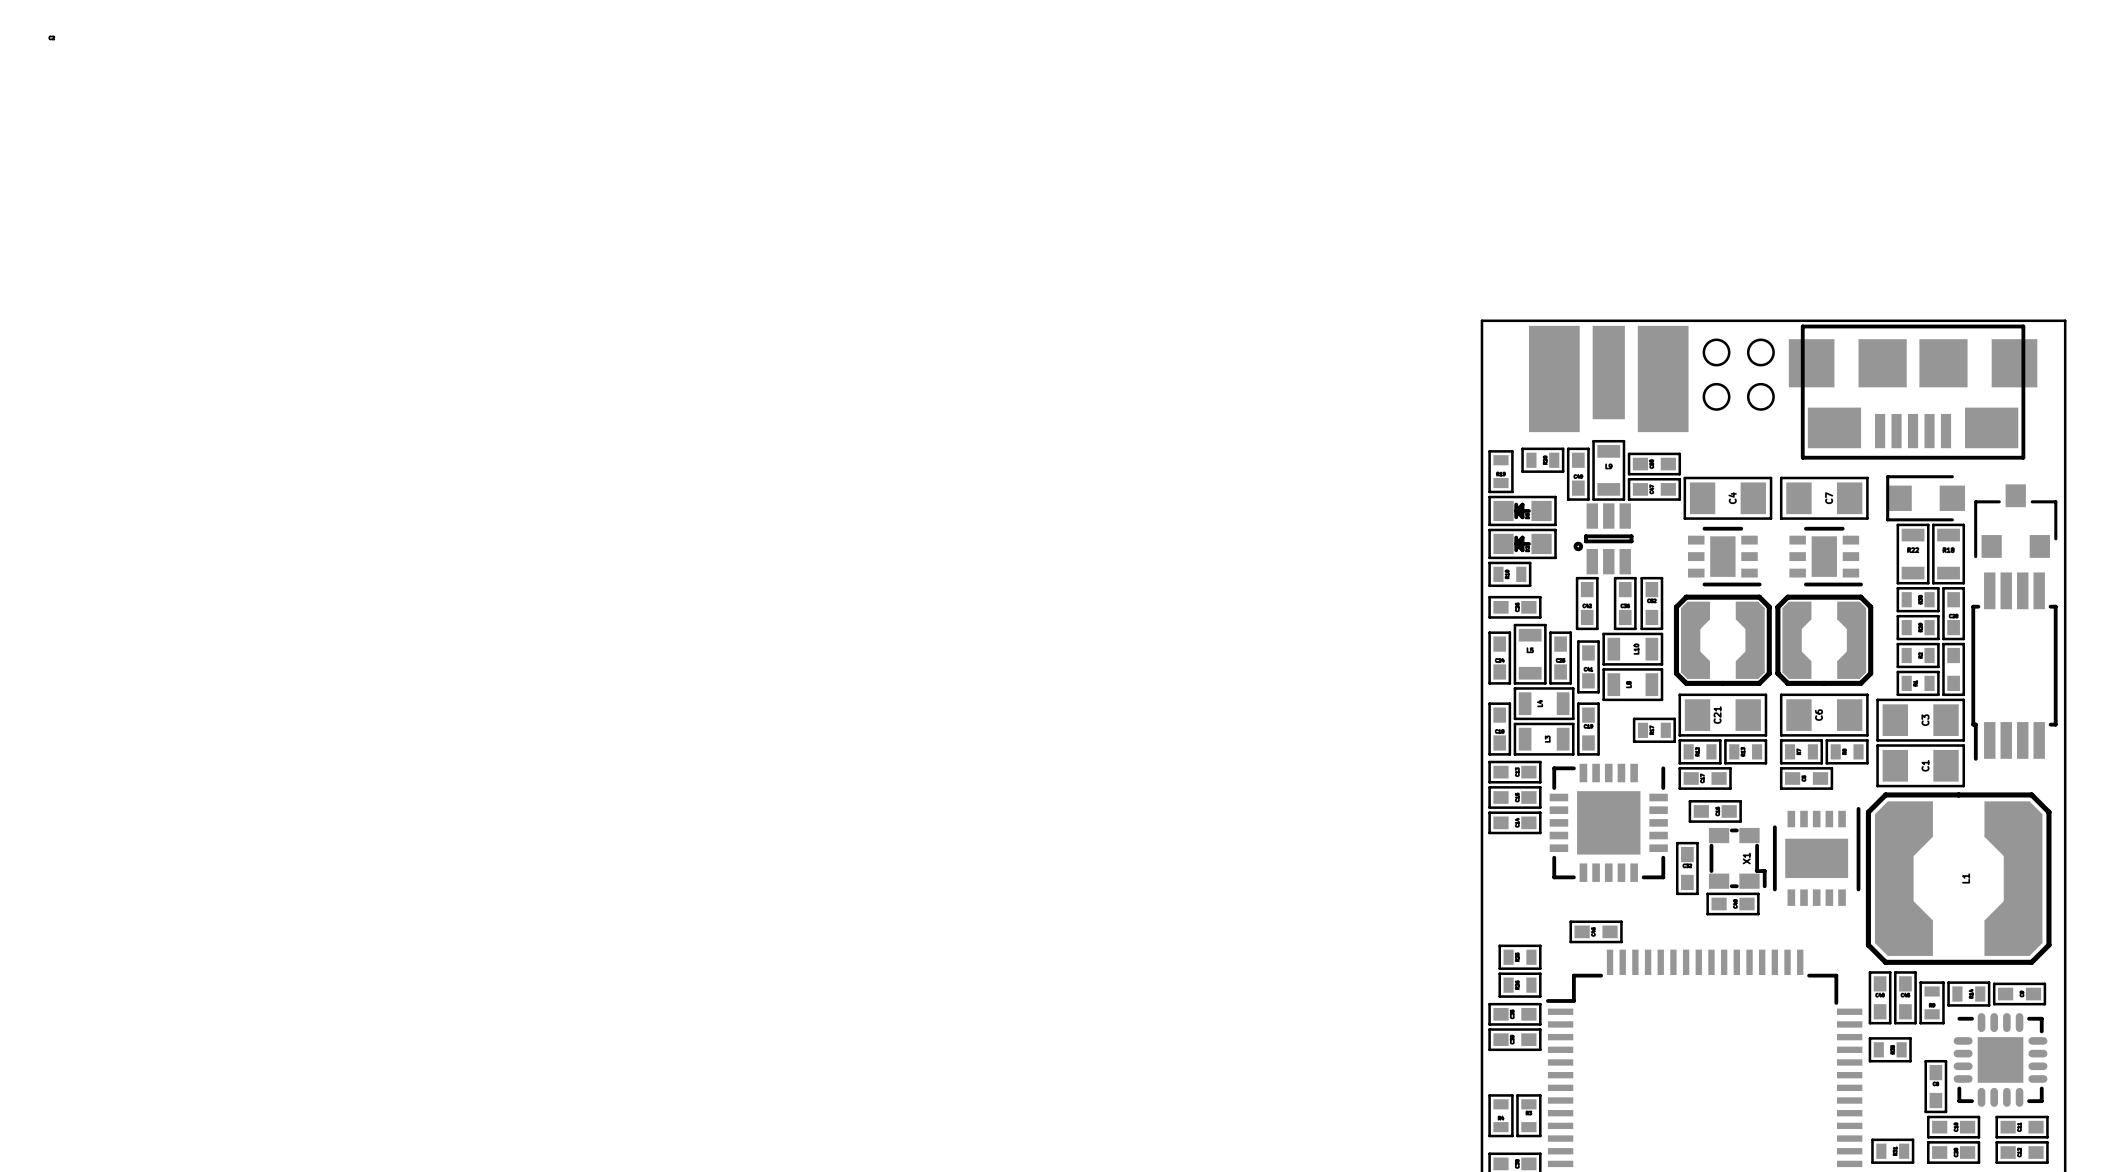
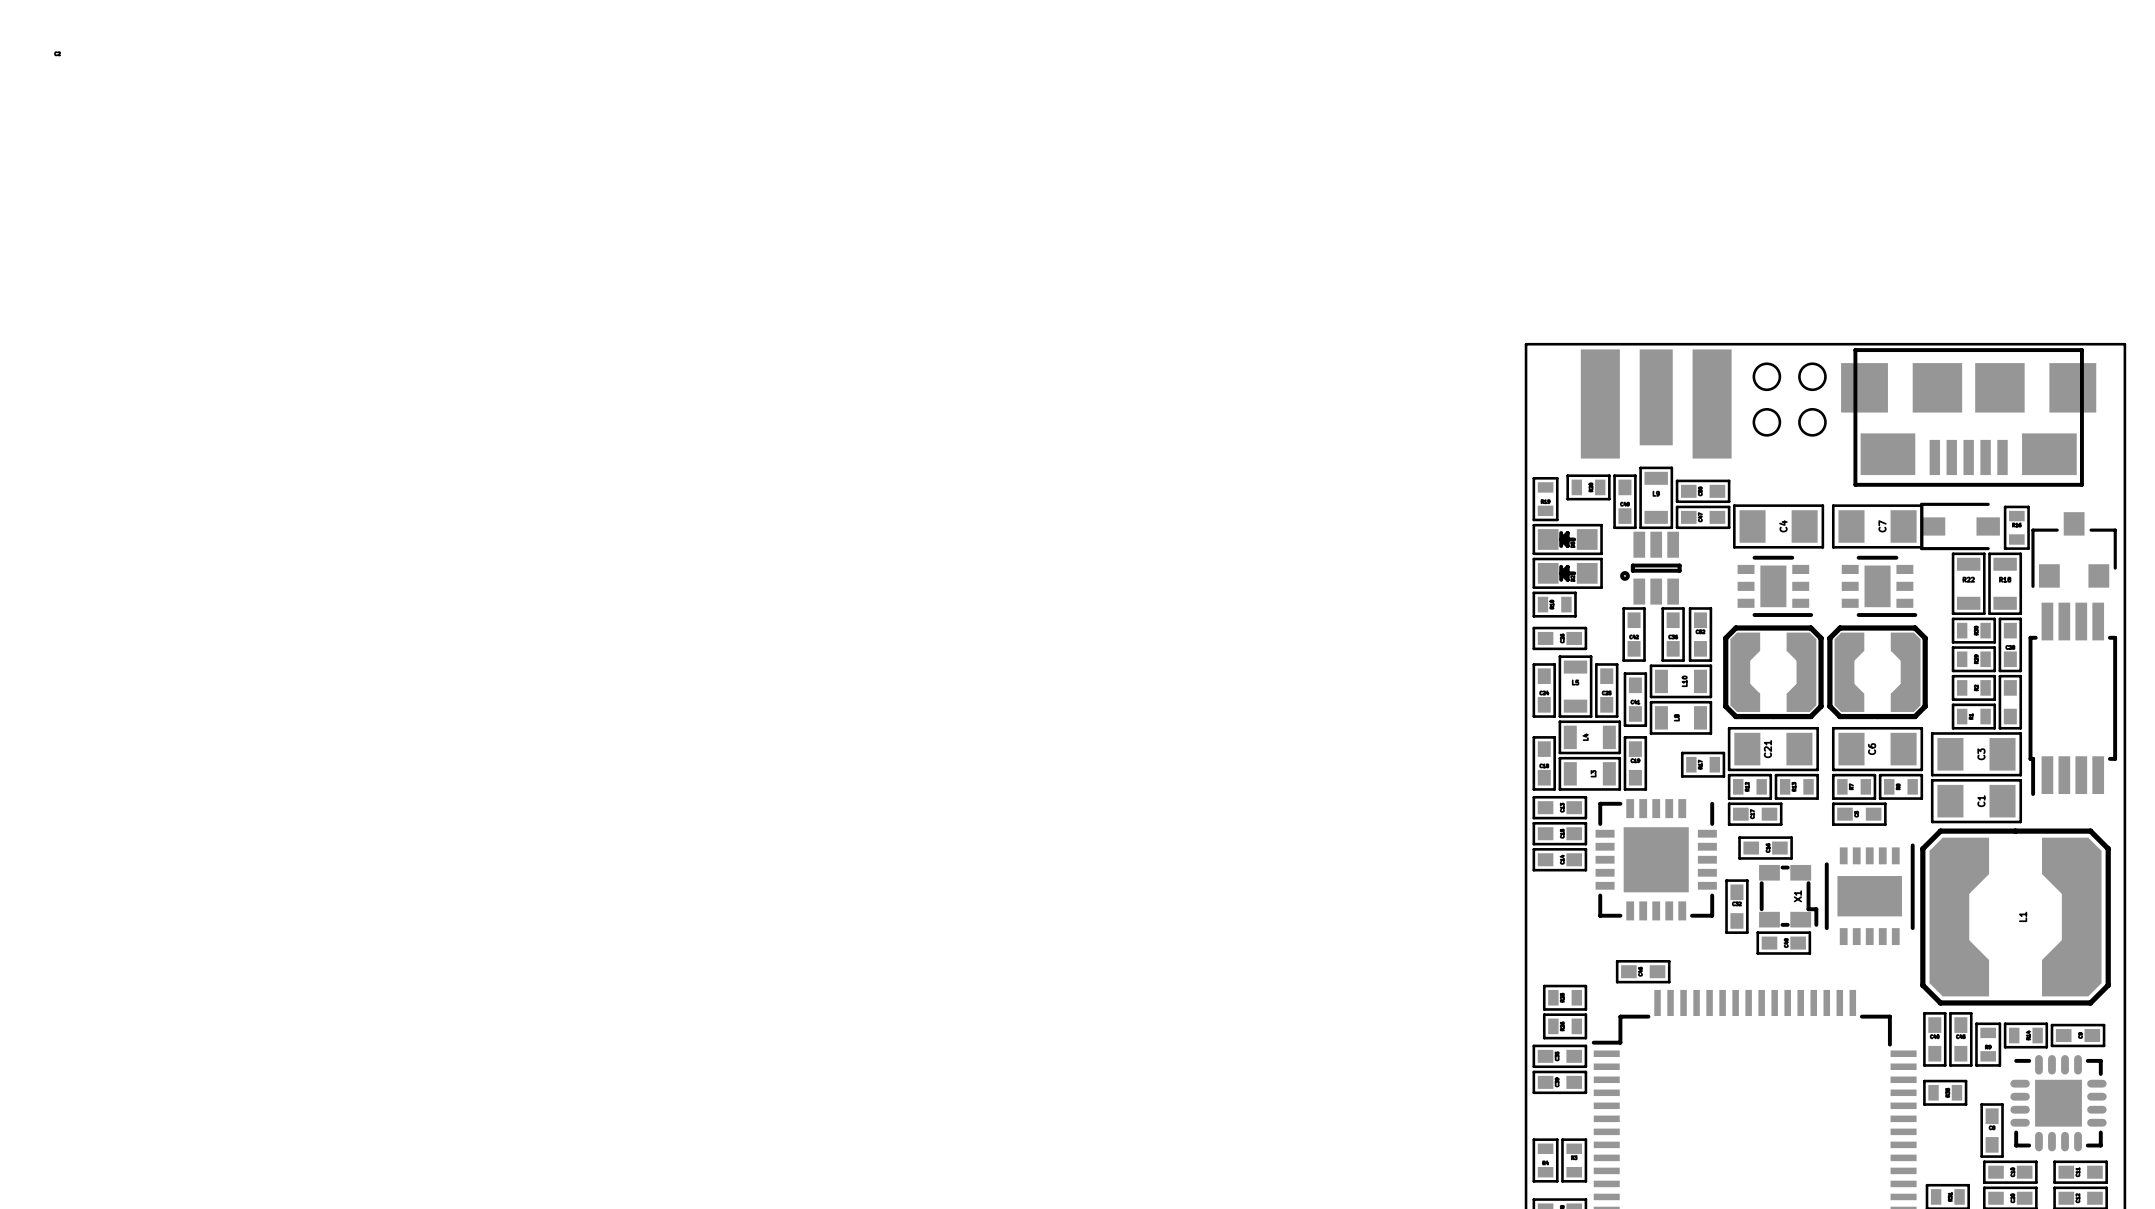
part footprint: [1528, 325, 1689, 433] -> [1580, 349, 1732, 459]
part footprint: [1886, 475, 1966, 522] -> [1920, 502, 2000, 551]
part: none -> (2016, 527)

